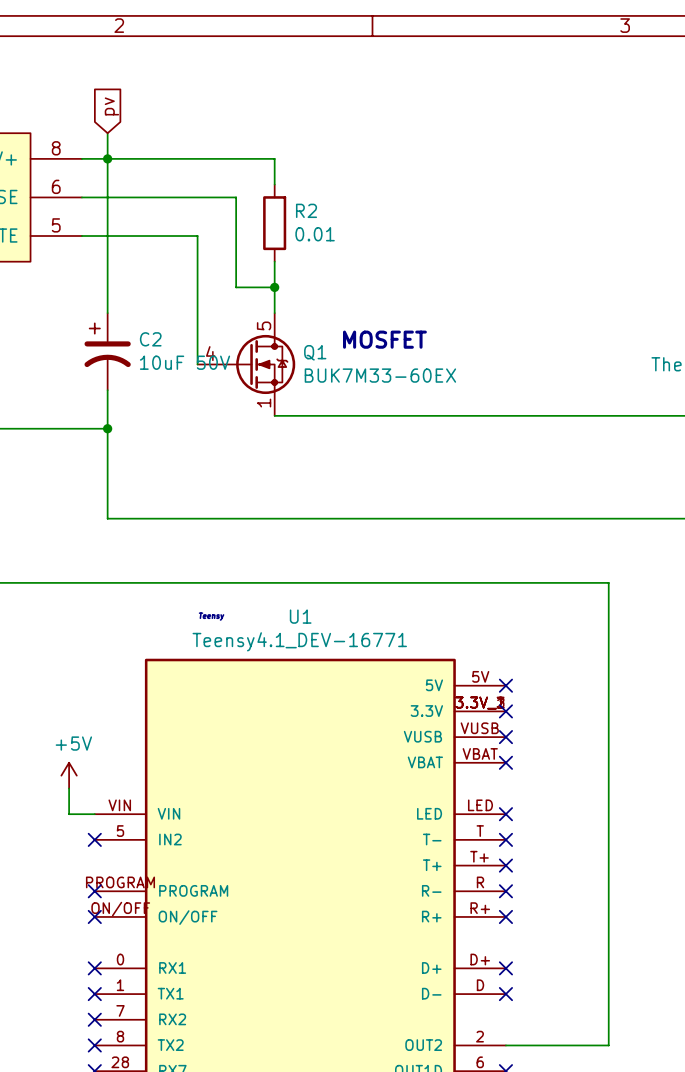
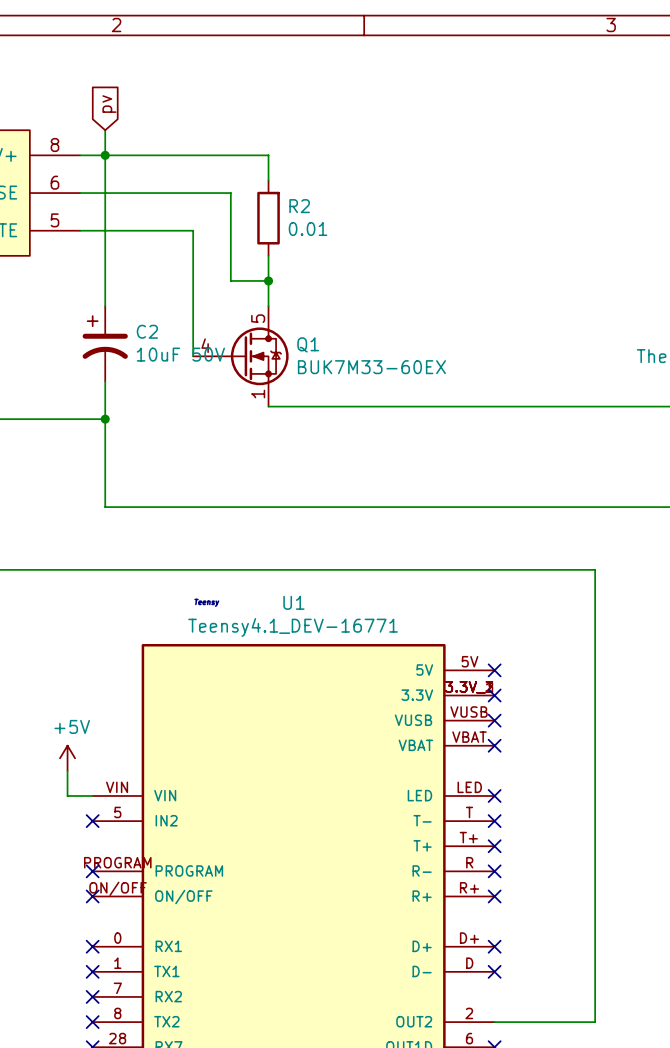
text: MOSFET (384, 339) -> none

